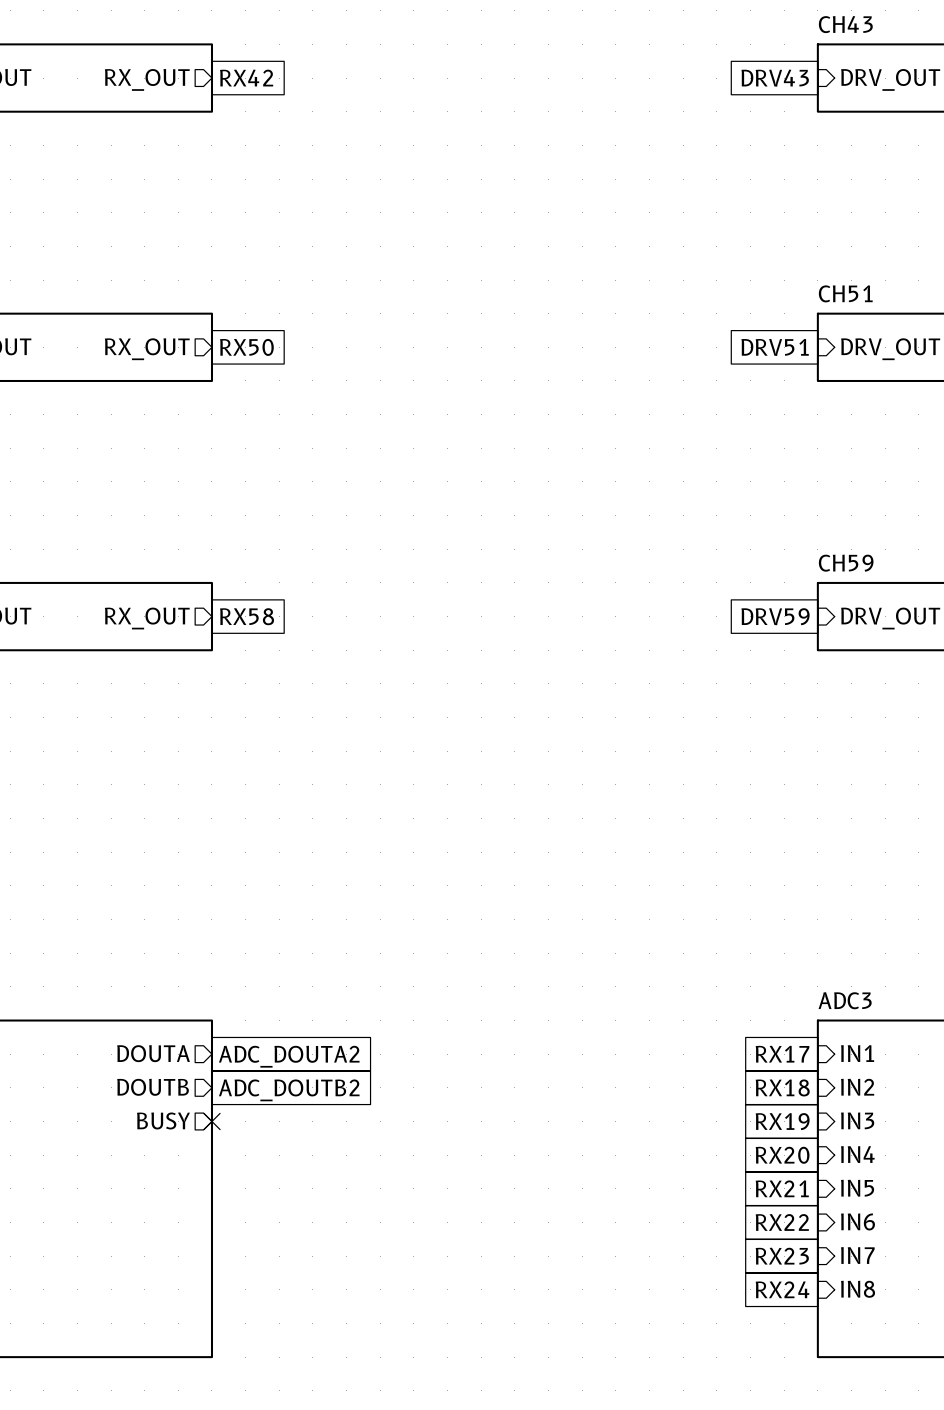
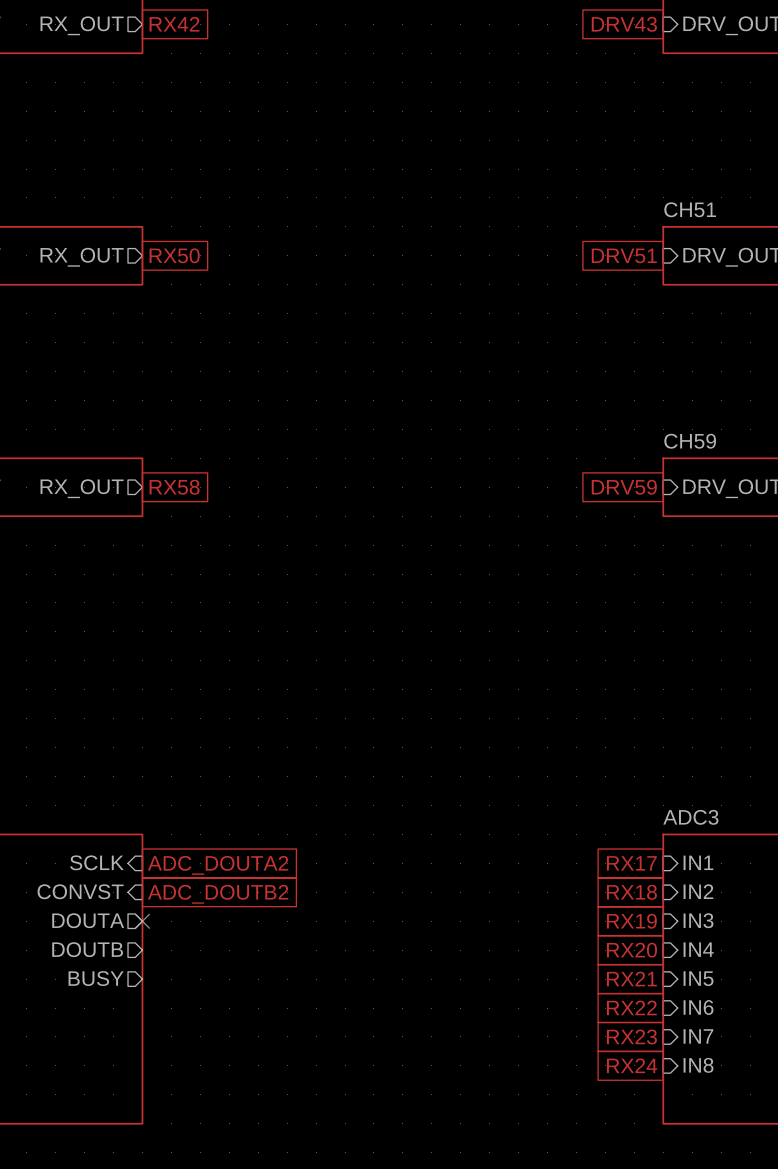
sheet pin shape: output (153, 1053) -> input (96, 862)
sheet pin: DOUTA (153, 1053) -> SCLK (96, 862)
sheet pin shape: output (153, 1087) -> input (80, 891)
sheet pin: DOUTB (153, 1087) -> CONVST (80, 891)
sheet pin: BUSY (163, 1120) -> DOUTA (88, 920)
sheet pin: none -> DOUTB (87, 949)
sheet pin: none -> BUSY (96, 978)

